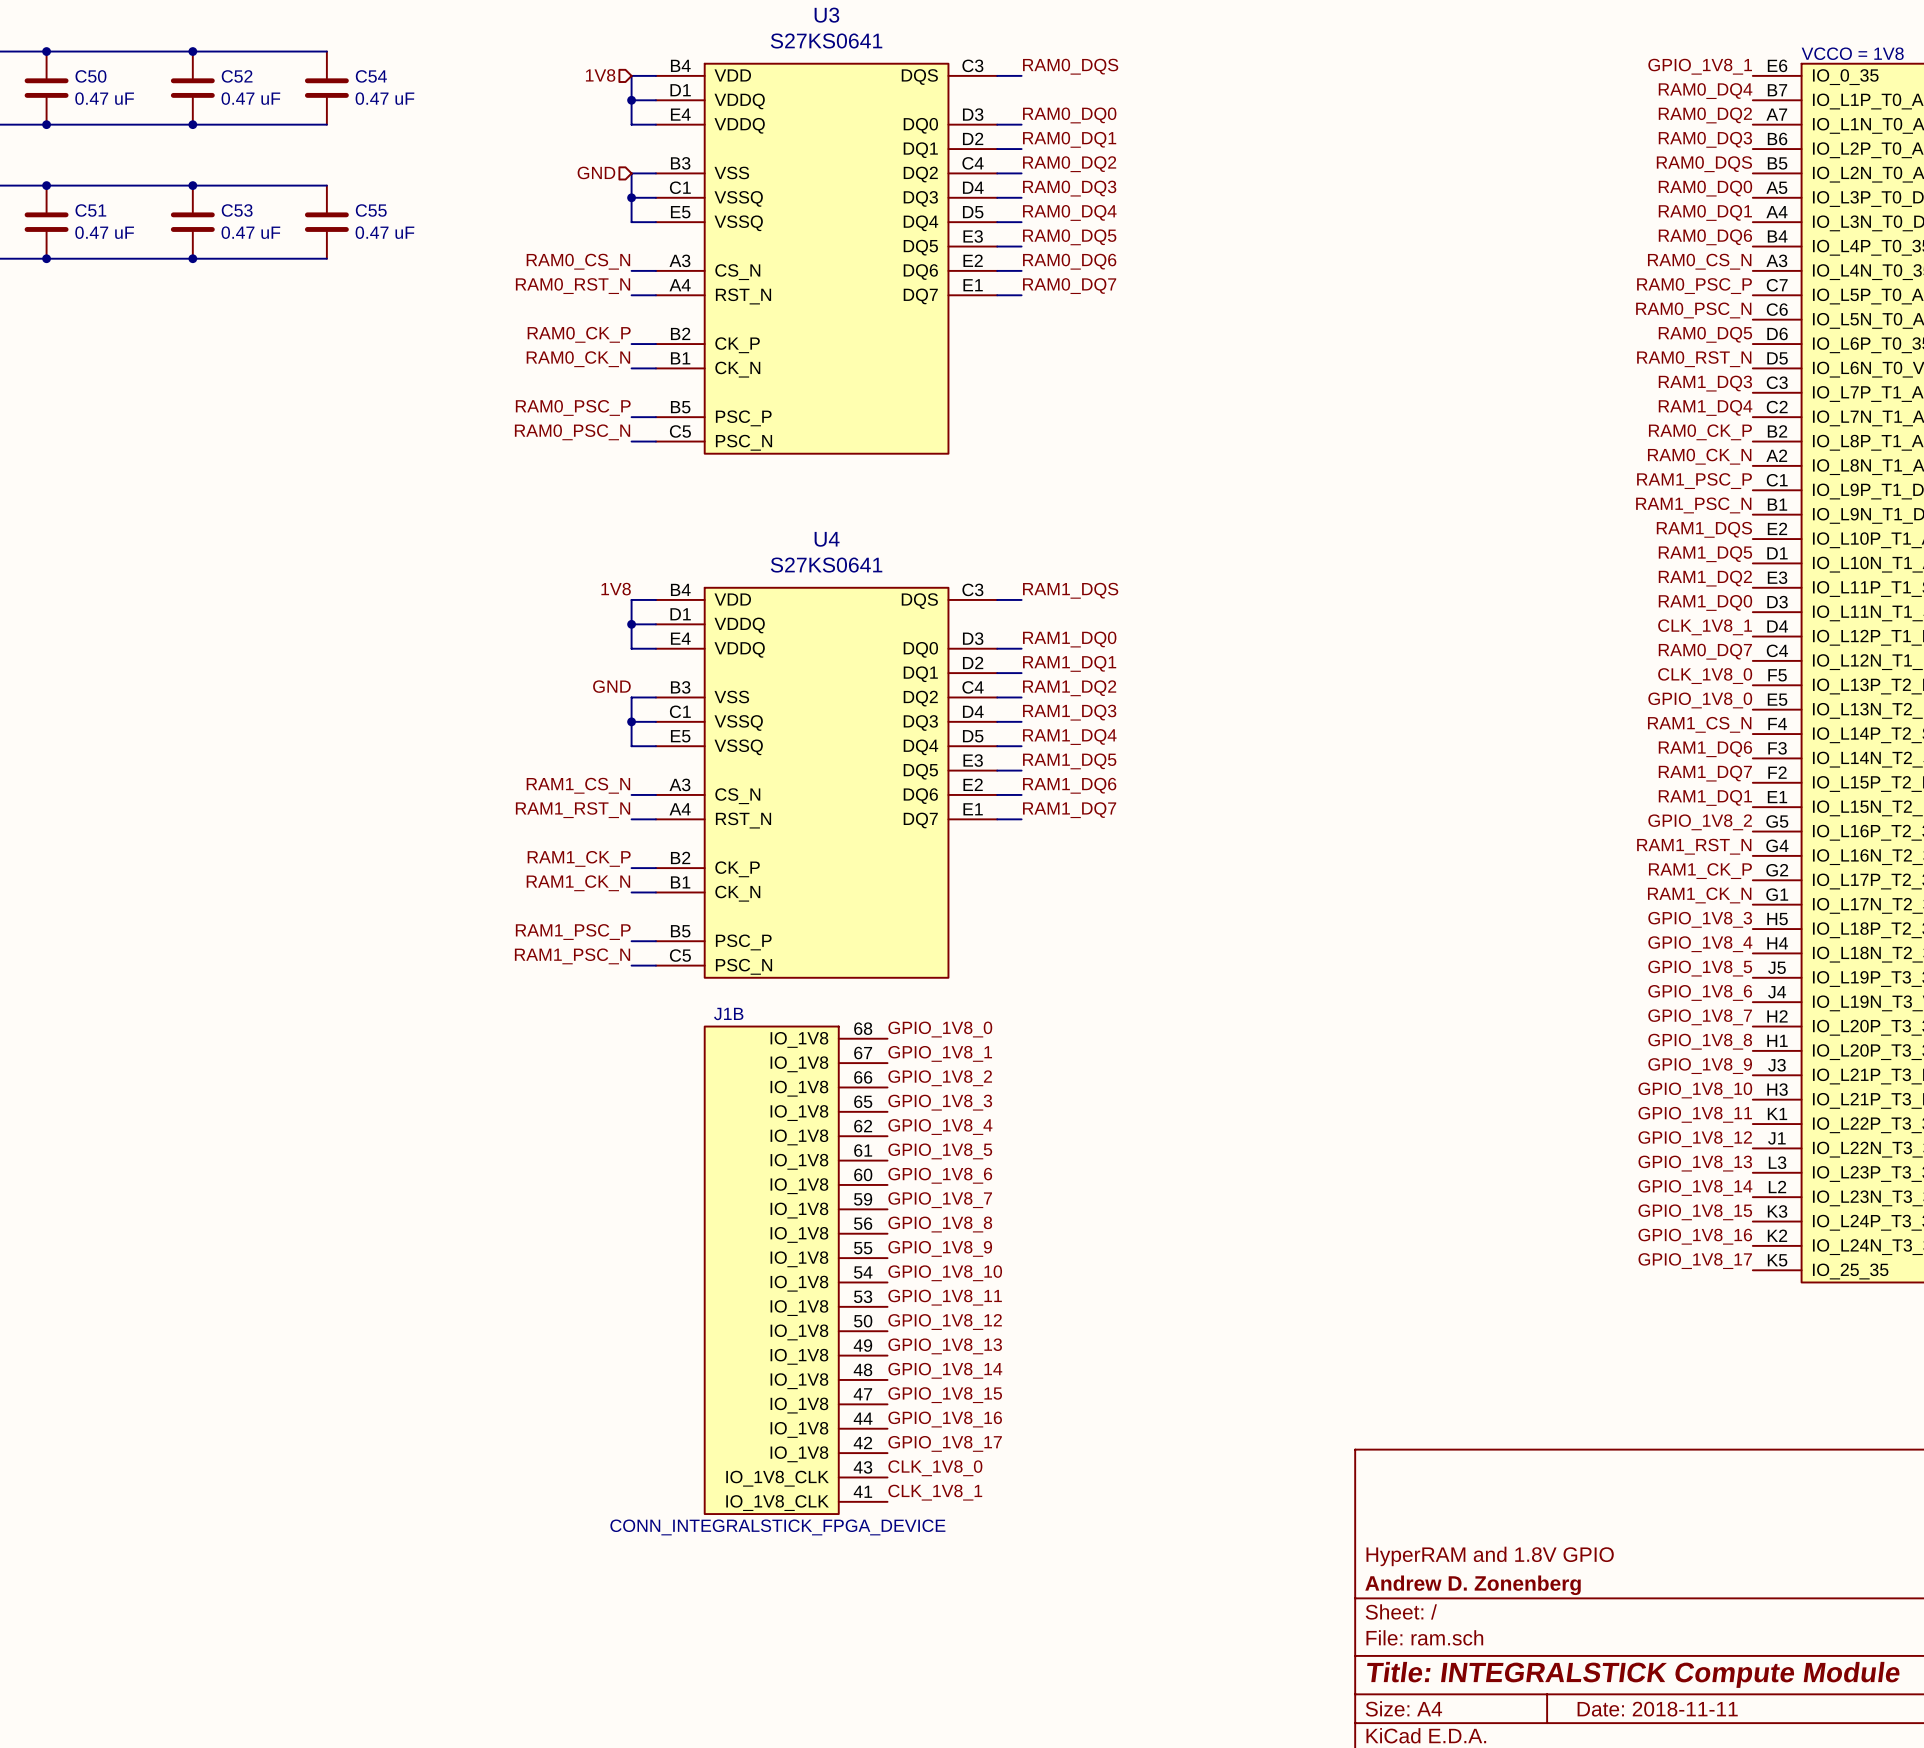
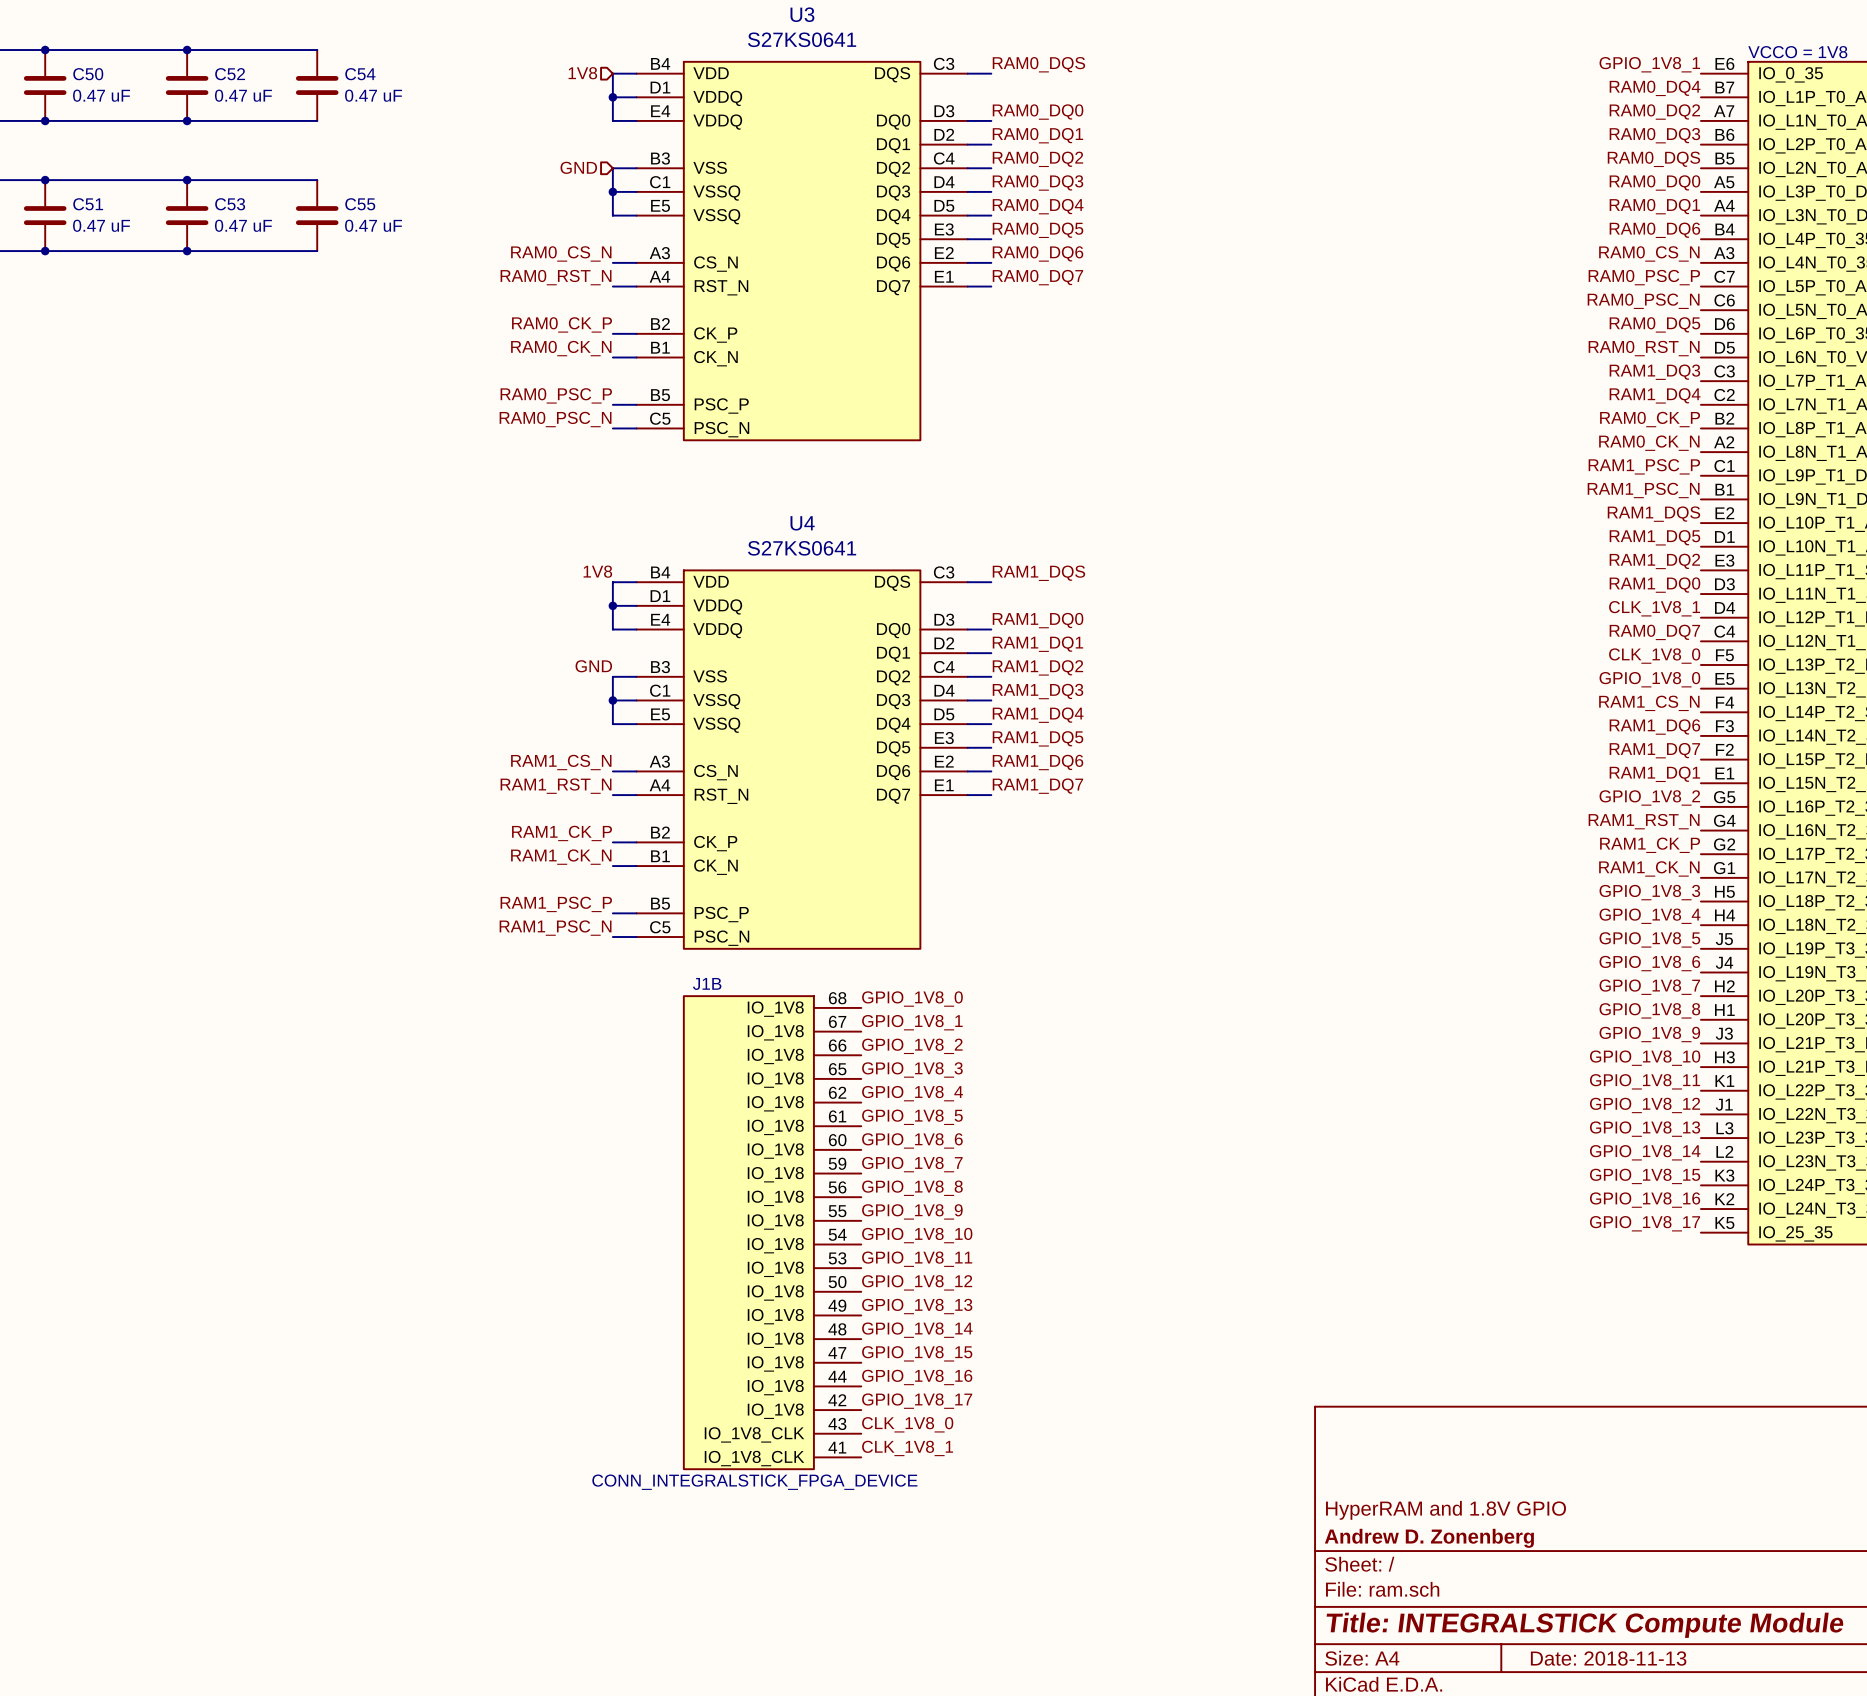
title block: Date: 2018-11-11 (1657, 1709) -> Date: 2018-11-13 (1608, 1658)

